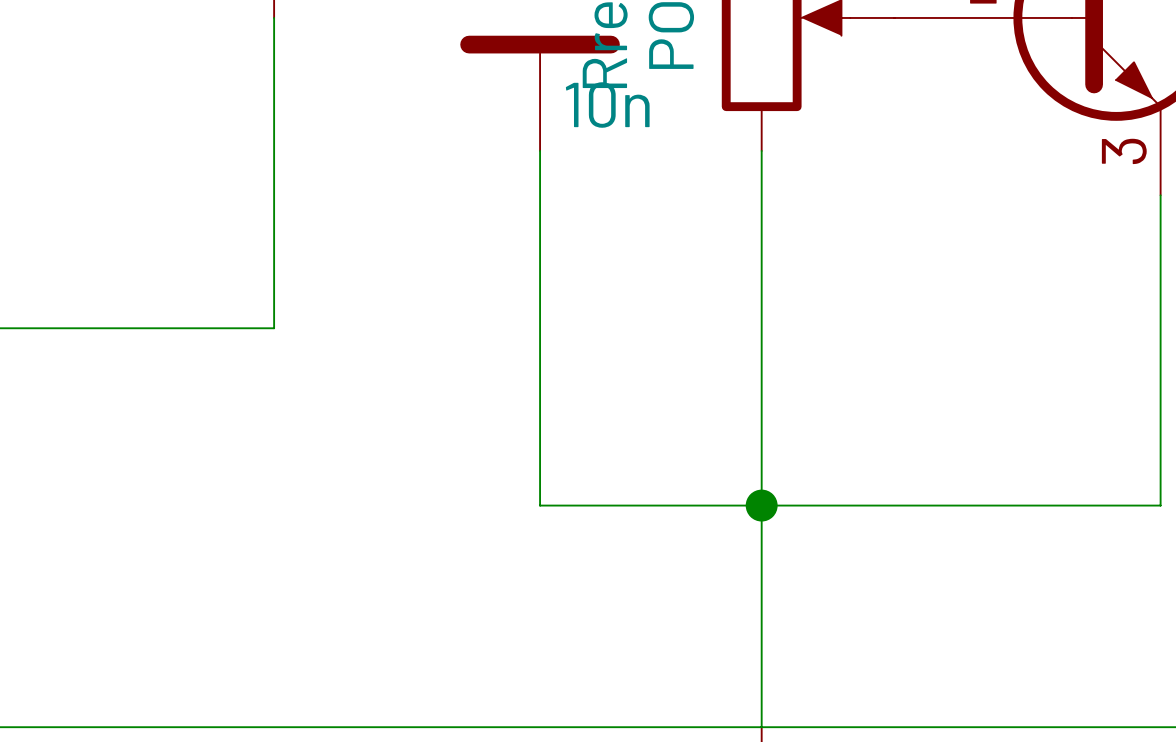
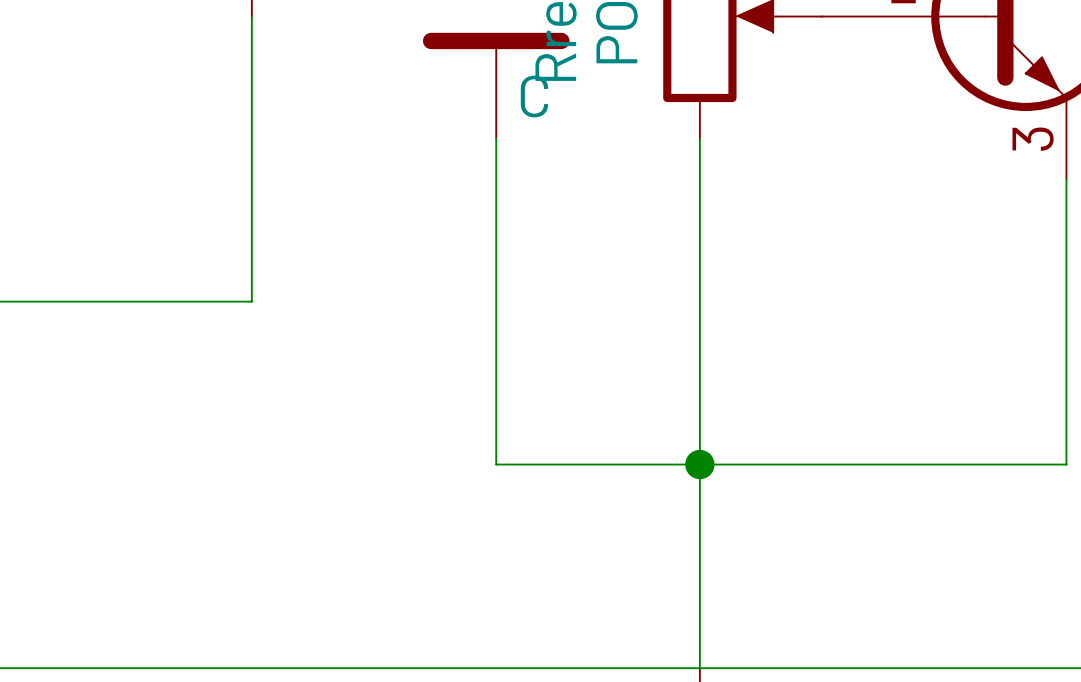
part value: 10n (607, 105) -> C (534, 96)

